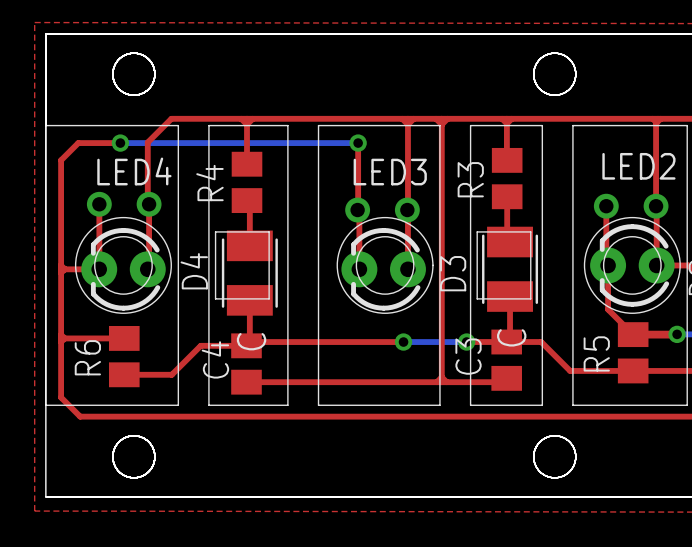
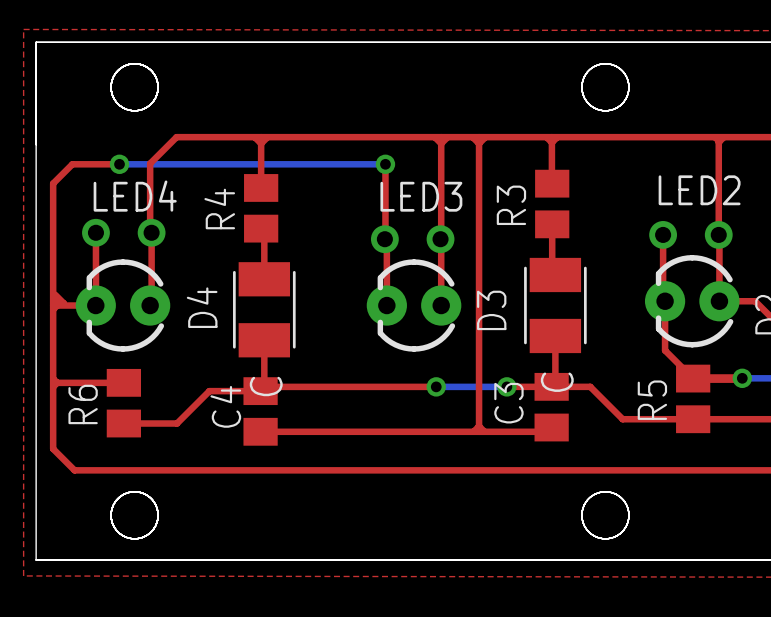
line: (45, 125) (178, 125) (178, 405) (45, 405) (45, 125) -> none
line: (208, 125) (287, 125) (287, 405) (208, 405) (208, 125) -> none
line: (318, 125) (439, 125) (439, 405) (318, 405) (318, 125) -> none
line: (470, 125) (542, 125) (542, 405) (470, 405) (470, 125) -> none
line: (572, 125) (687, 125) (687, 405) (572, 405) (572, 125) -> none
drawing: [75, 217, 172, 314] -> none
drawing: [337, 217, 433, 314] -> none
drawing: [584, 217, 681, 314] -> none
line: (215, 231) (269, 231) (269, 298) (215, 298) (215, 231) -> none
line: (477, 231) (530, 231) (530, 298) (477, 298) (477, 231) -> none
top track: none -> (55, 294) (63, 303) (57, 301)
line: (432, 265) (433, 265) -> none

